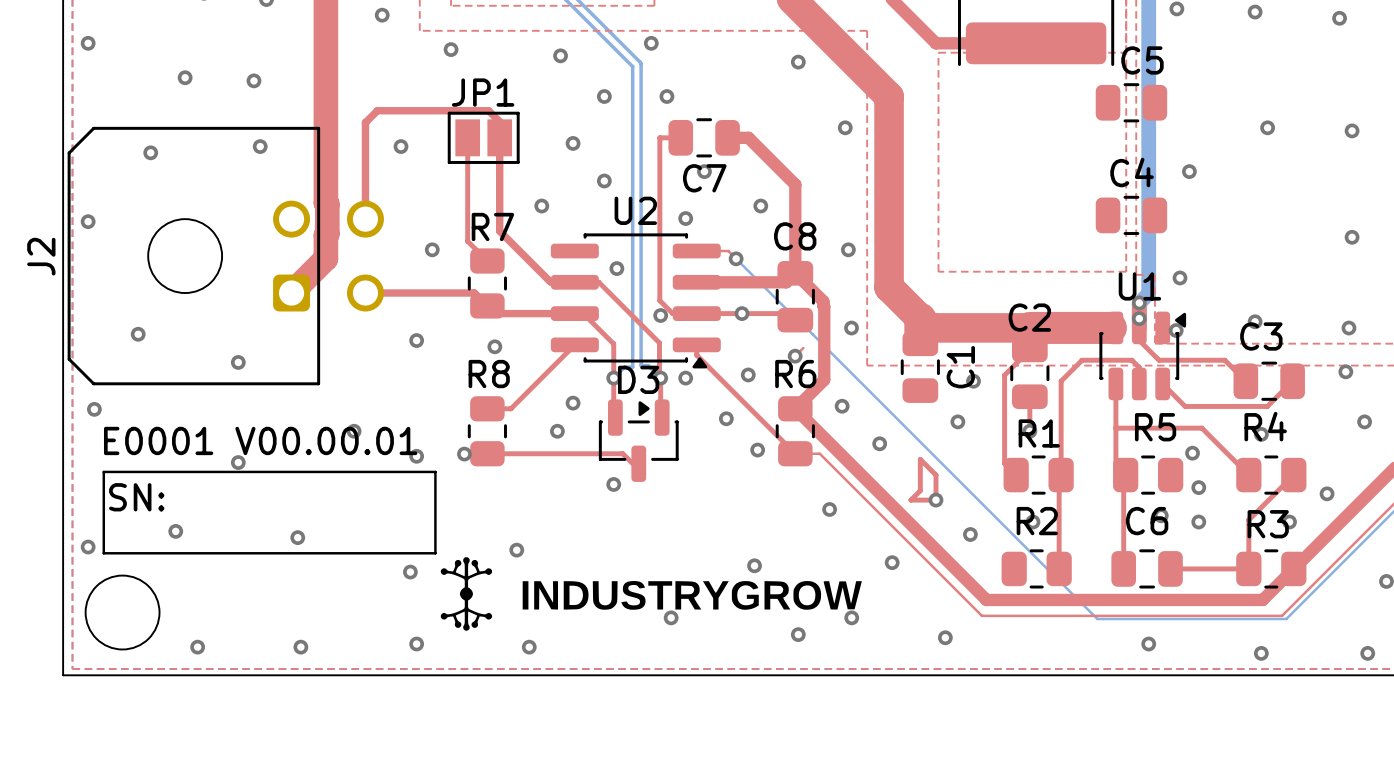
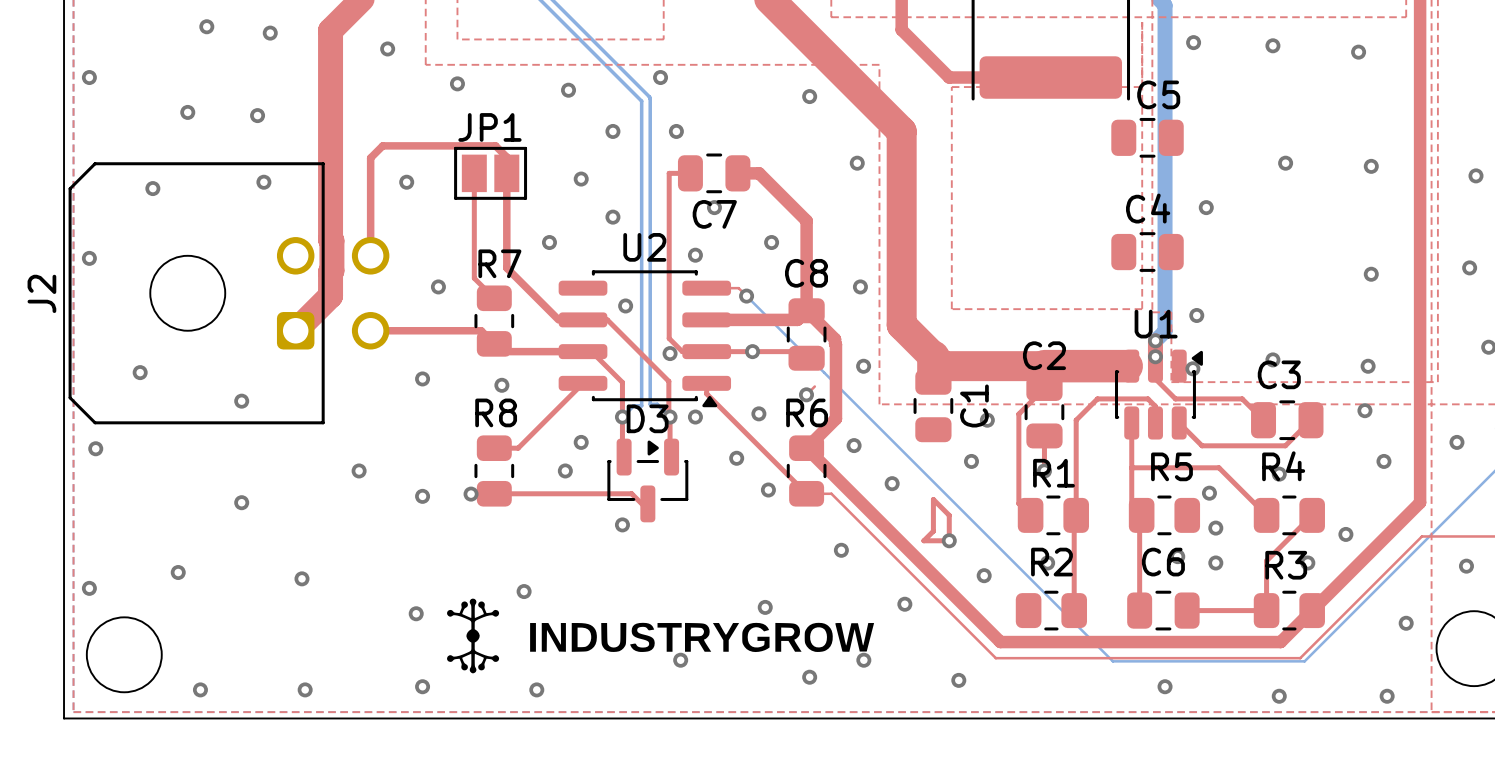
text: E0001 V00.00.01 (260, 440) -> none
line: (103, 471) (435, 471) (435, 553) (103, 553) (103, 471) -> none
text: SN: (136, 497) -> none

